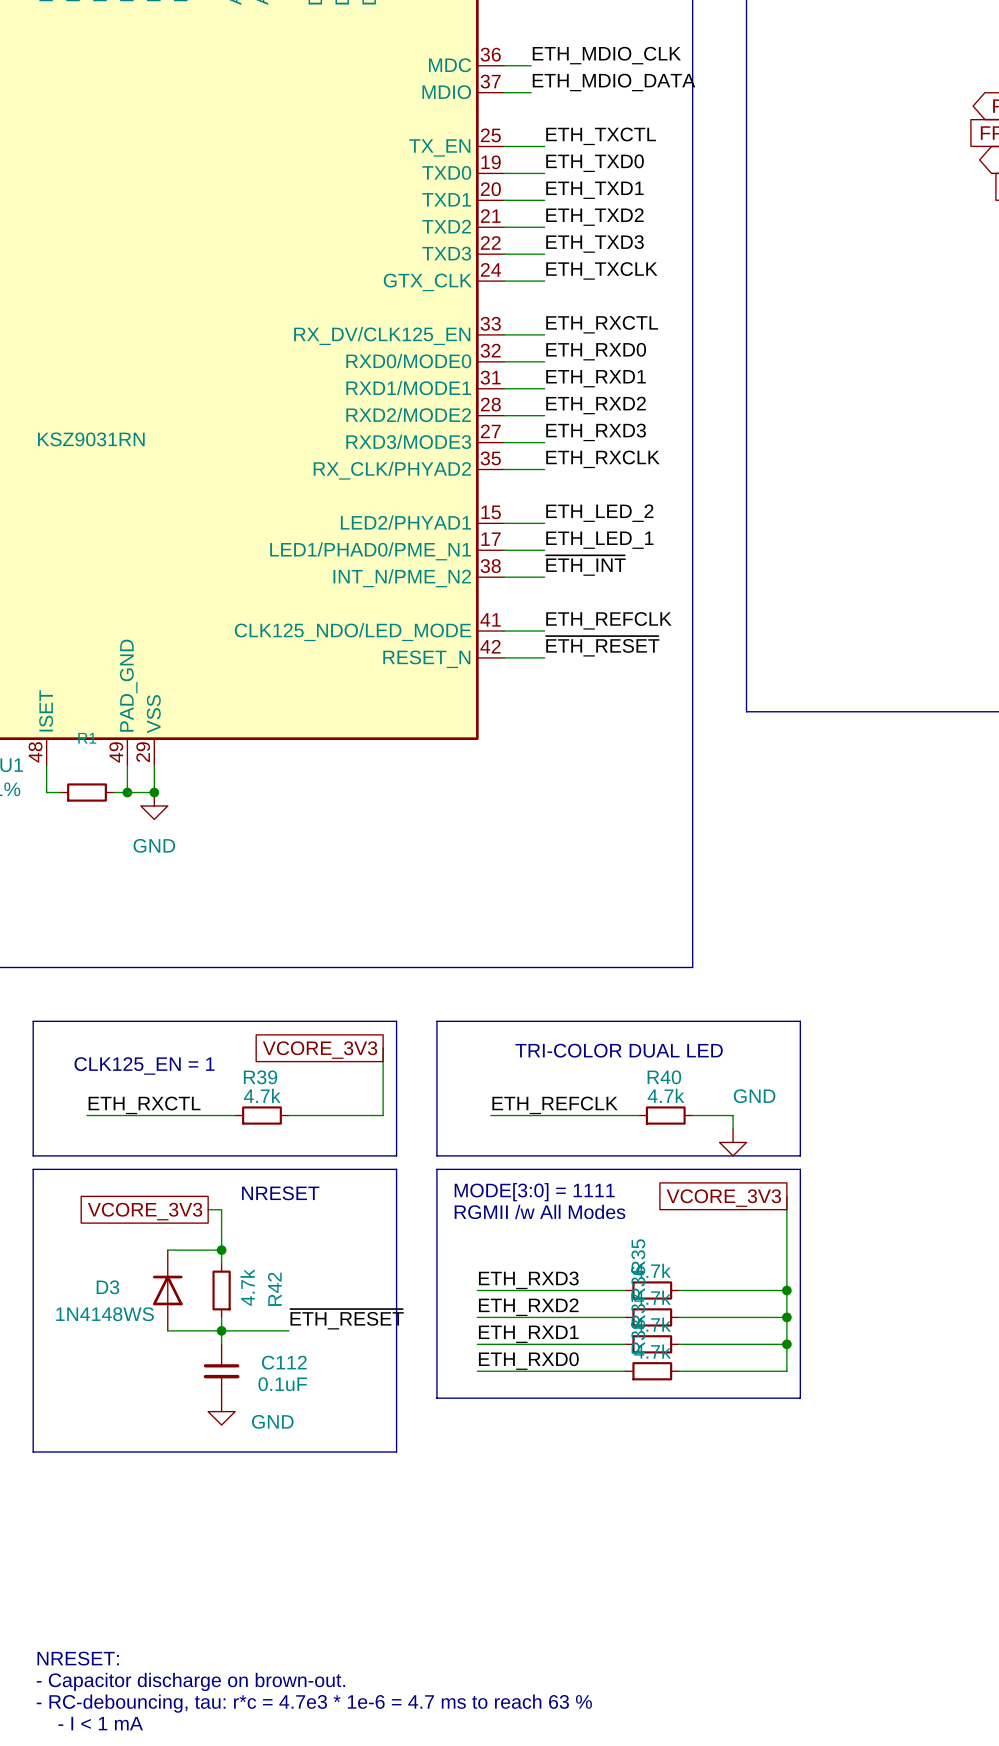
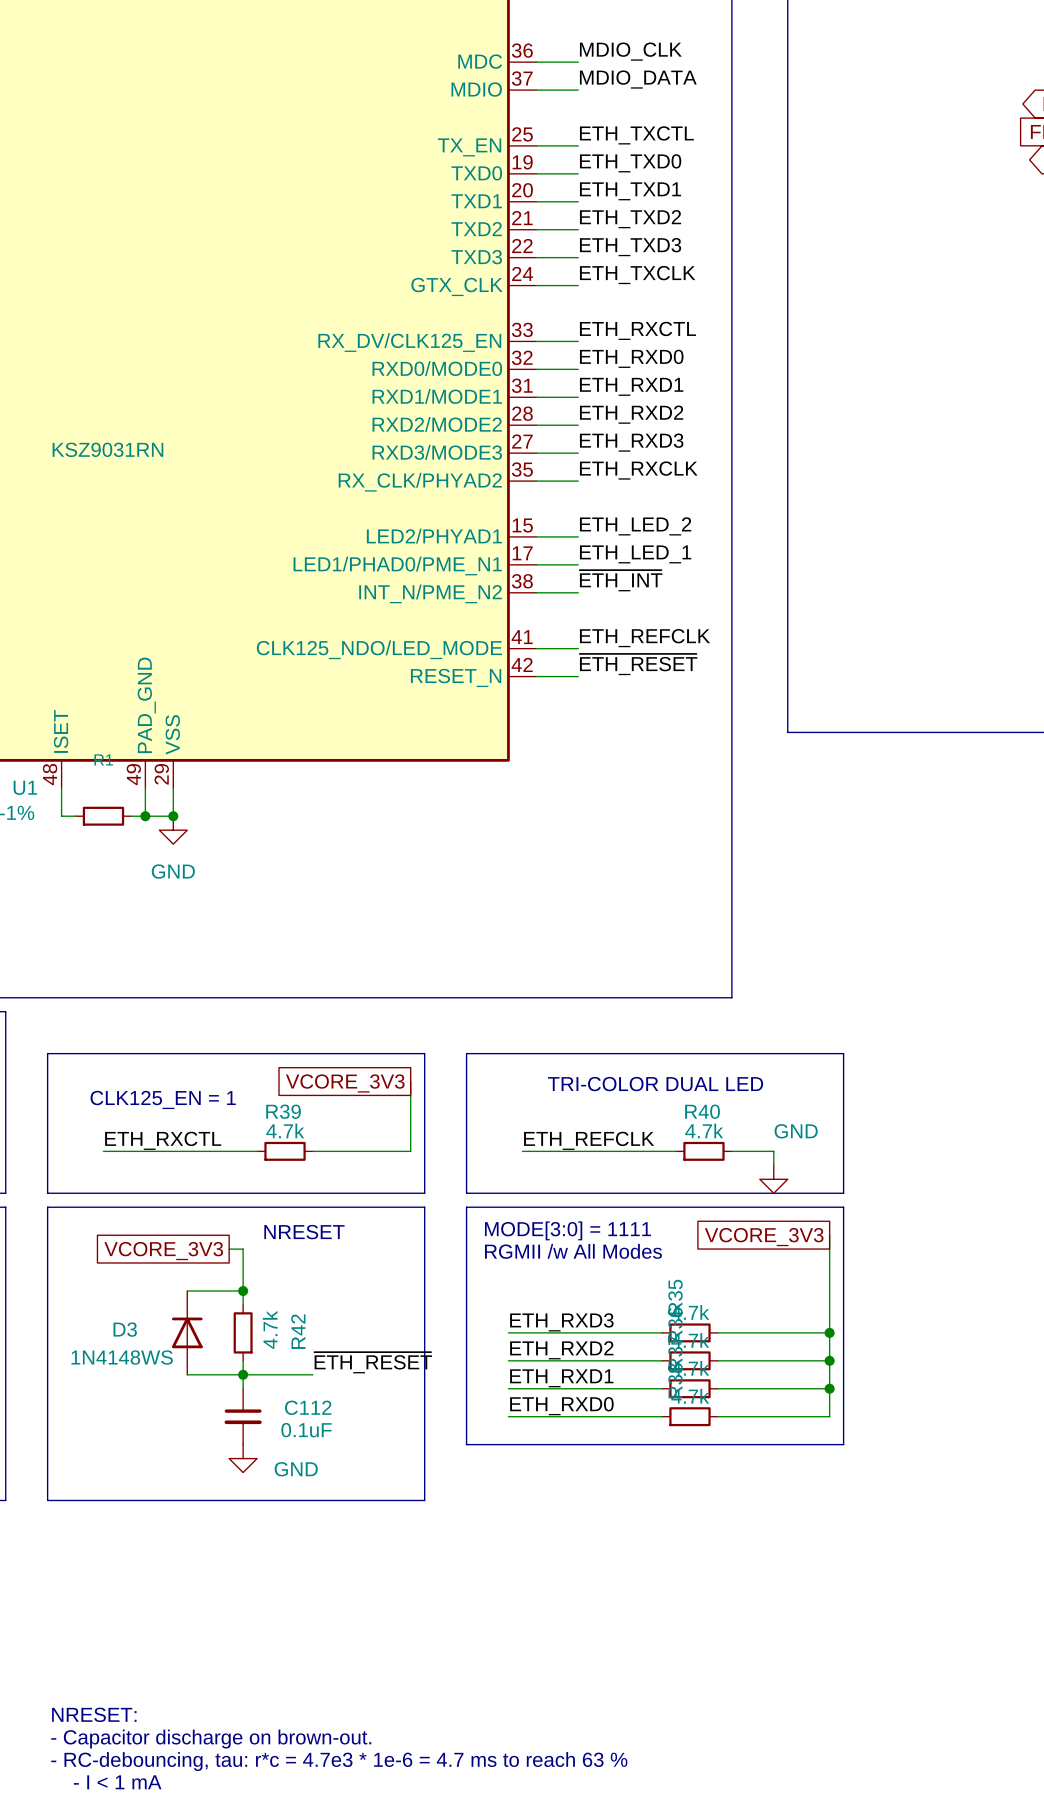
label: ETH_MDIO_CLK (606, 55) -> MDIO_CLK (630, 51)
wire: none -> (564, 62) (578, 62)
label: ETH_MDIO_DATA (614, 82) -> MDIO_DATA (638, 79)
wire: none -> (564, 90) (578, 90)

